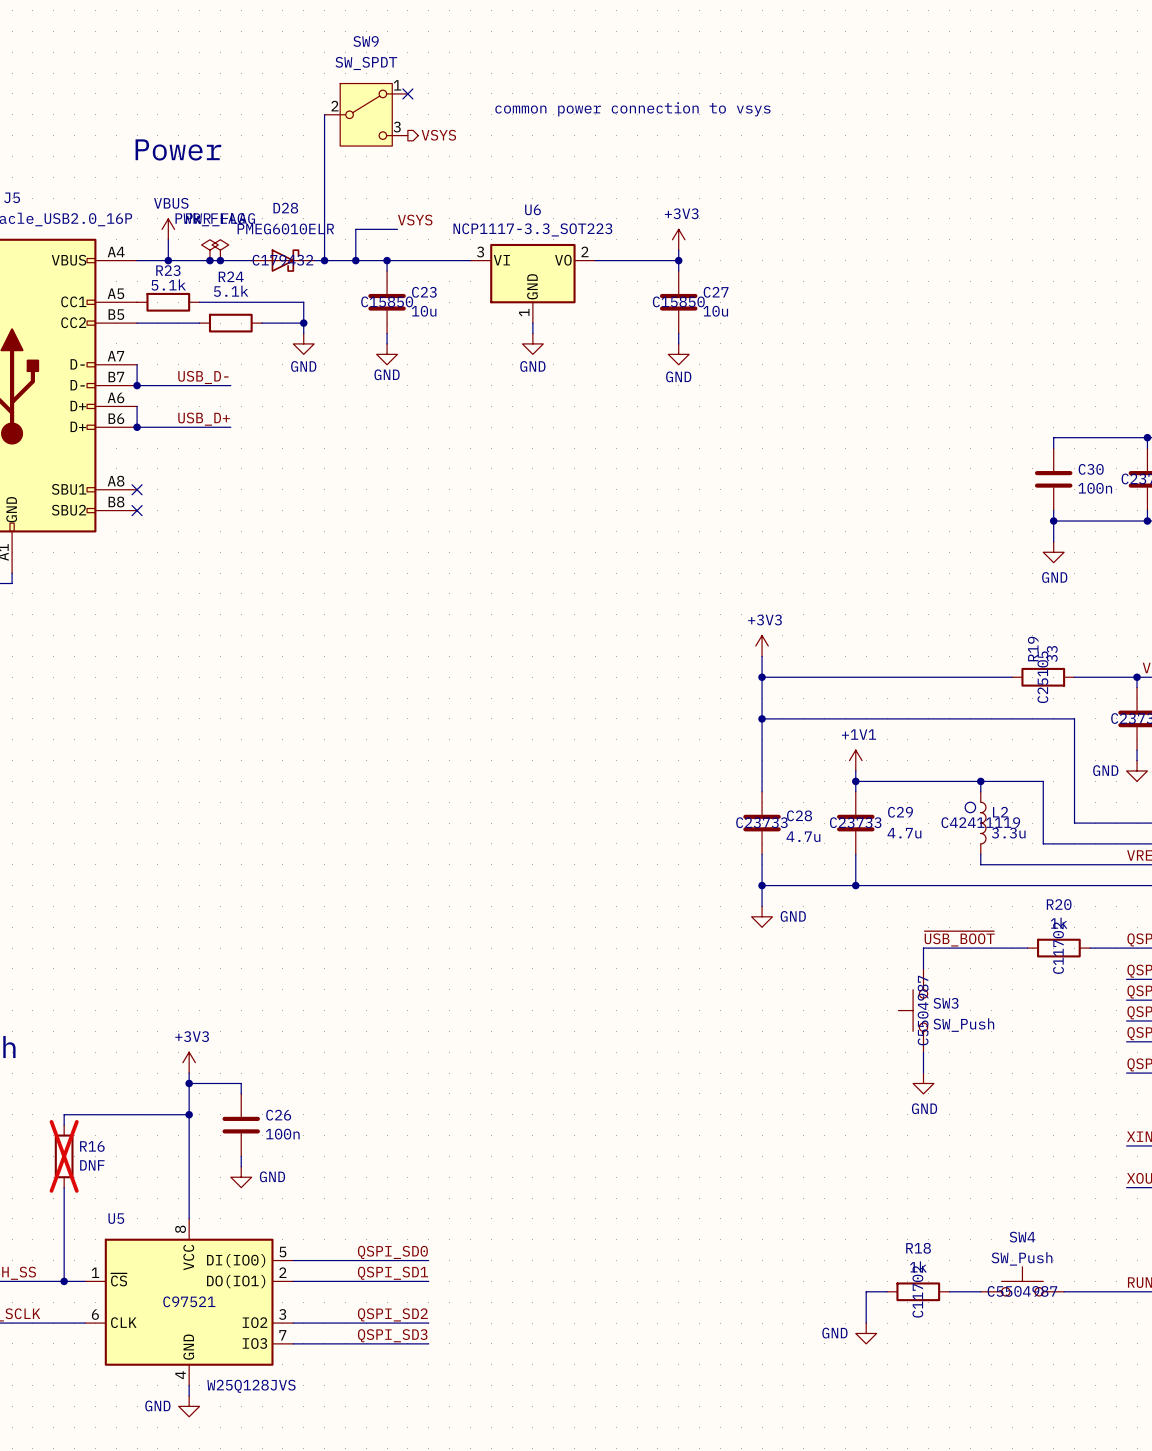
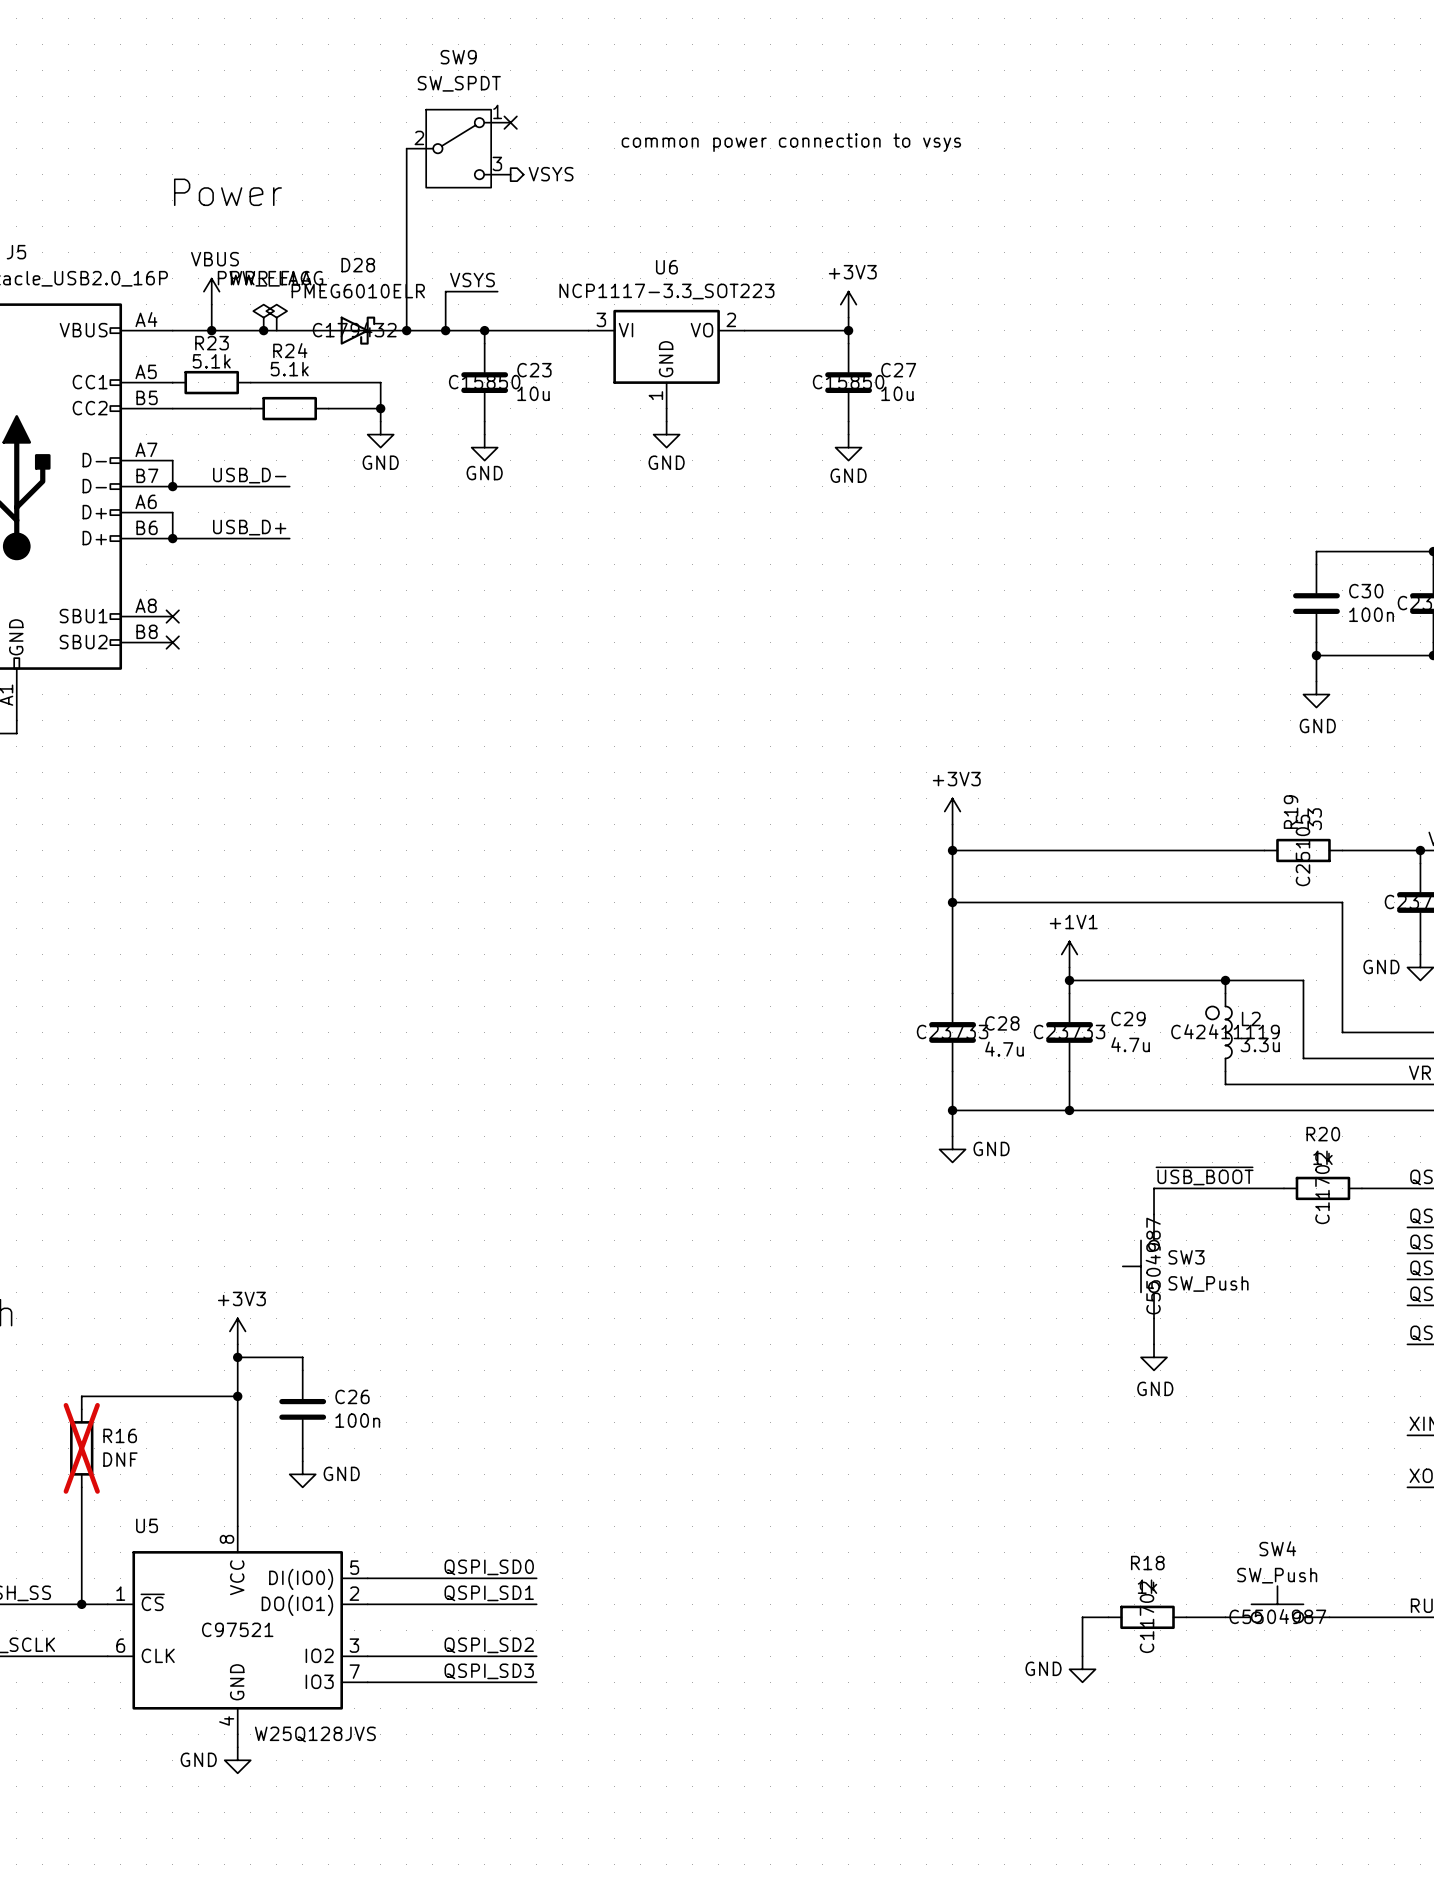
label position: VSYS (415, 220) -> VSYS (472, 280)
junction: (220, 260) -> none

